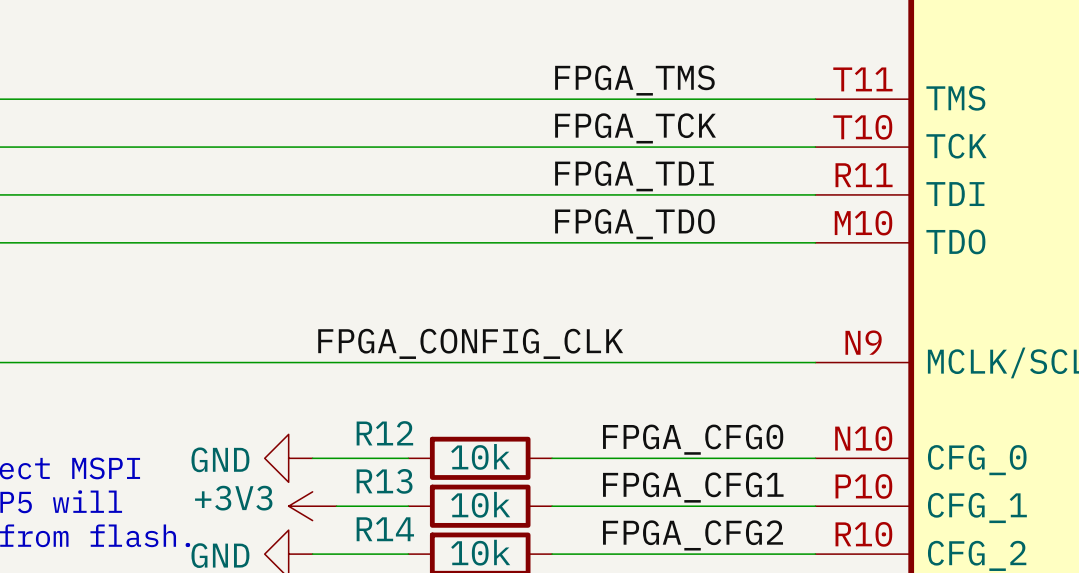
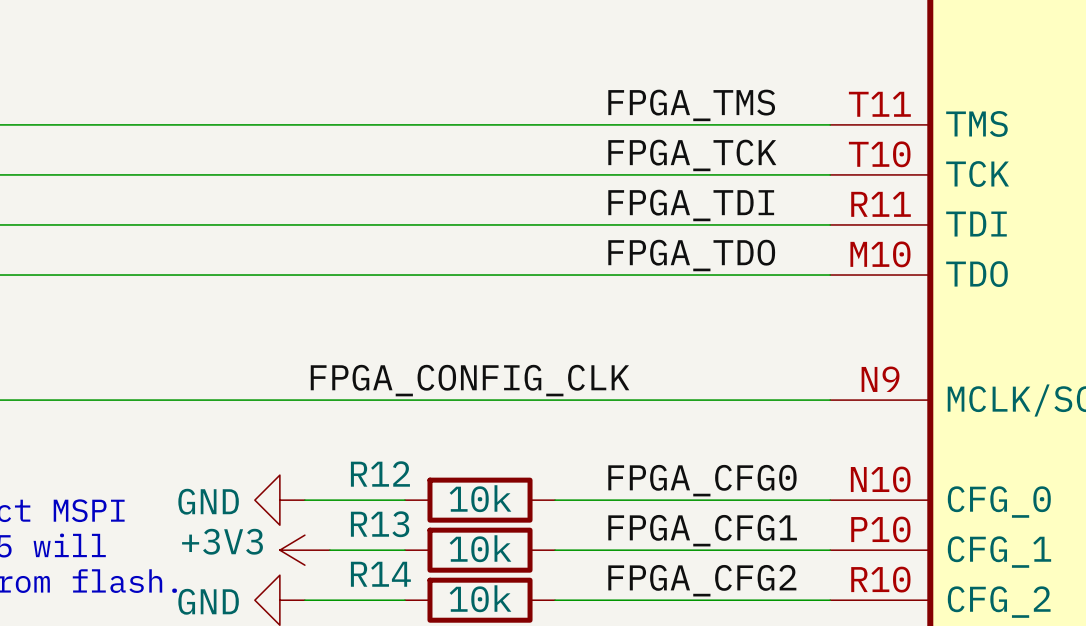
label position: FPGA_TMS (634, 80) -> FPGA_TMS (691, 105)
label position: FPGA_TCK (635, 128) -> FPGA_TCK (692, 155)
label position: FPGA_TDI (634, 176) -> FPGA_TDI (691, 205)
label position: FPGA_TDO (634, 224) -> FPGA_TDO (691, 255)

